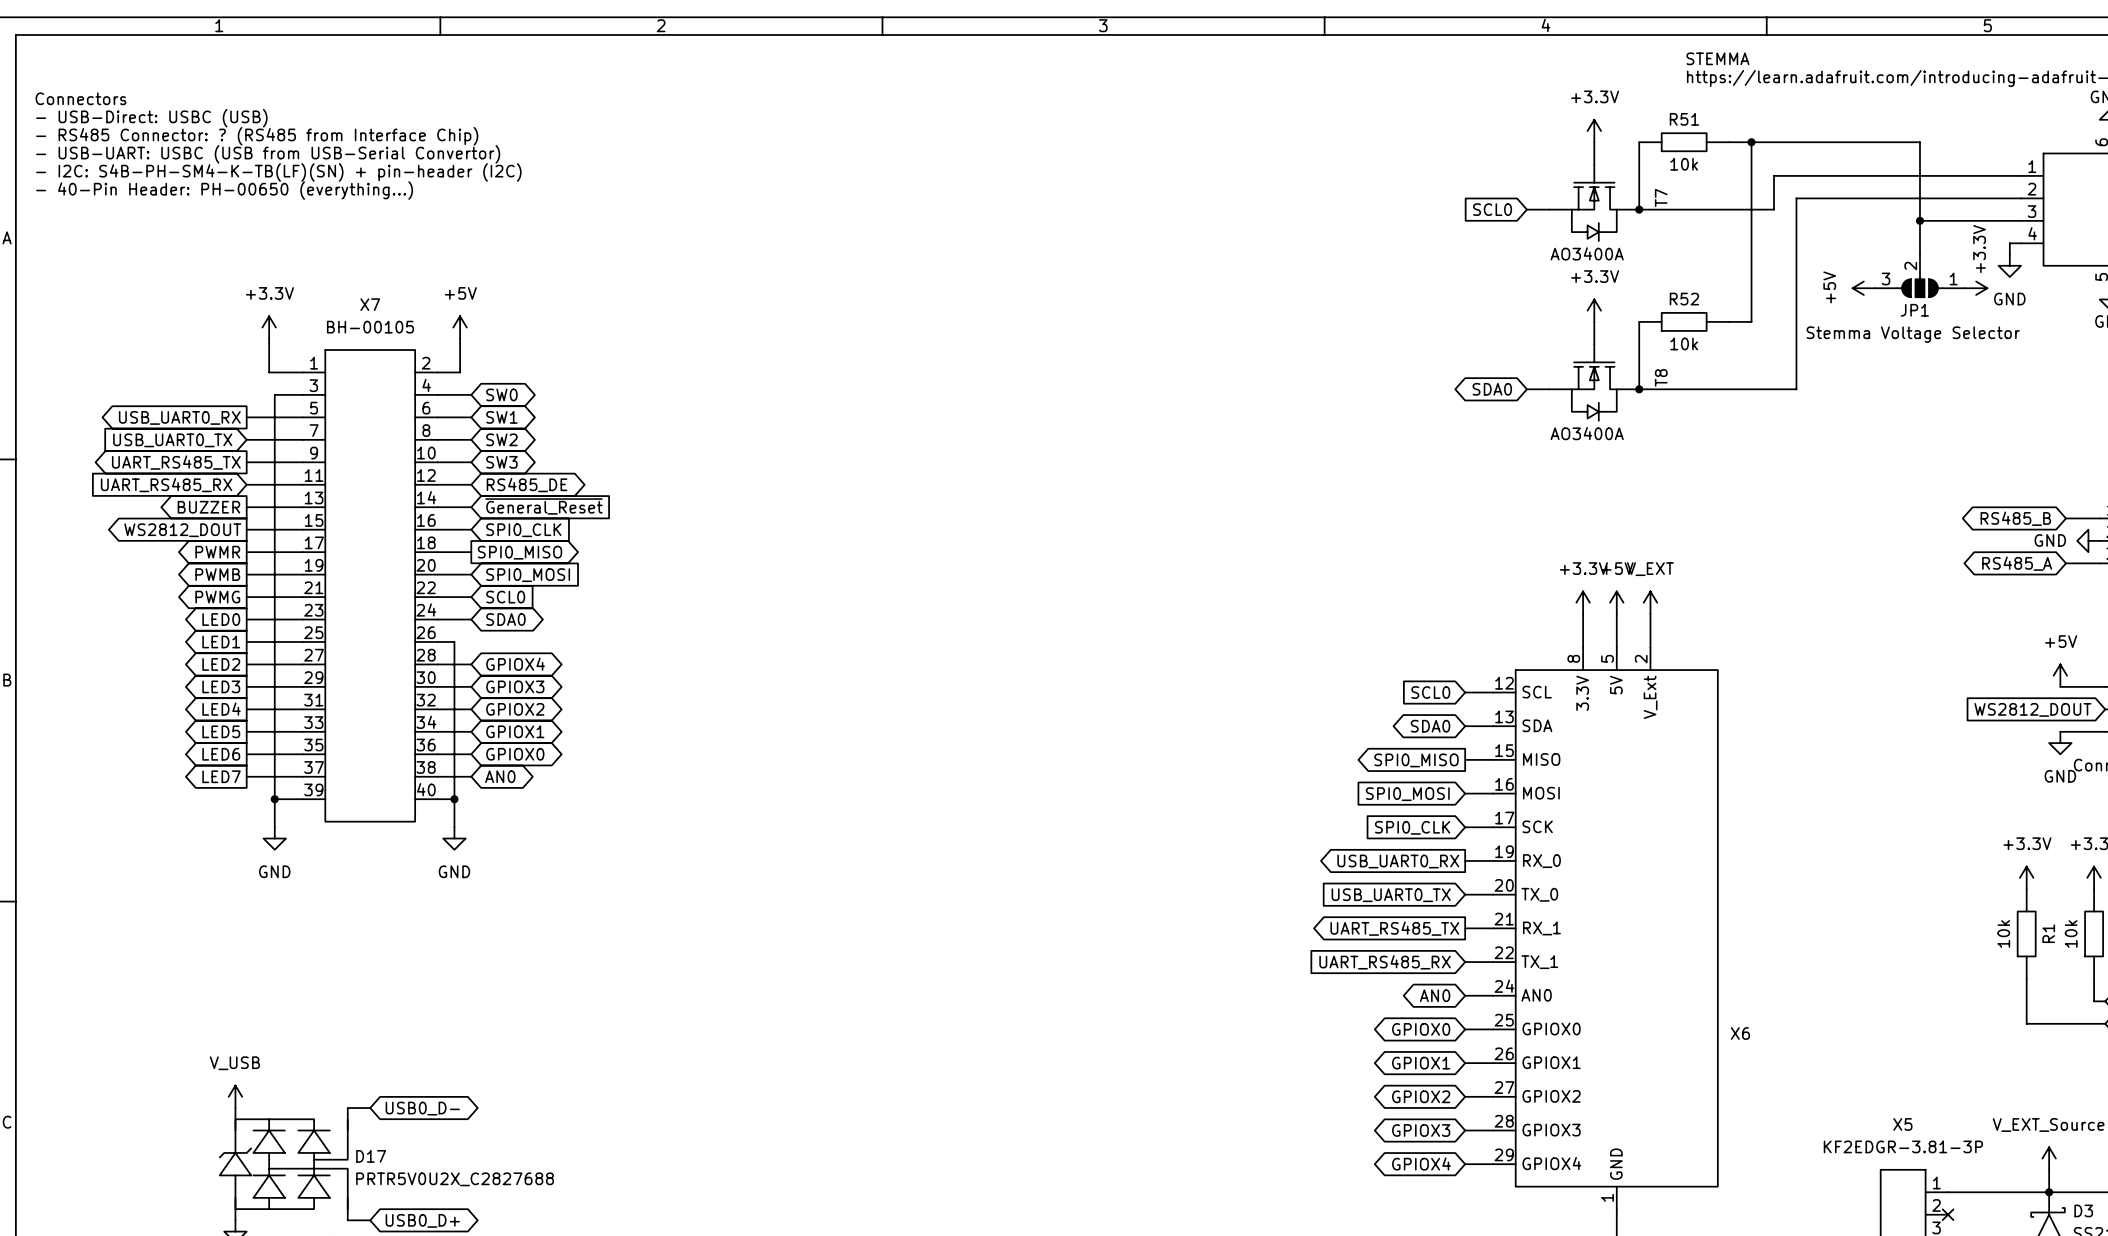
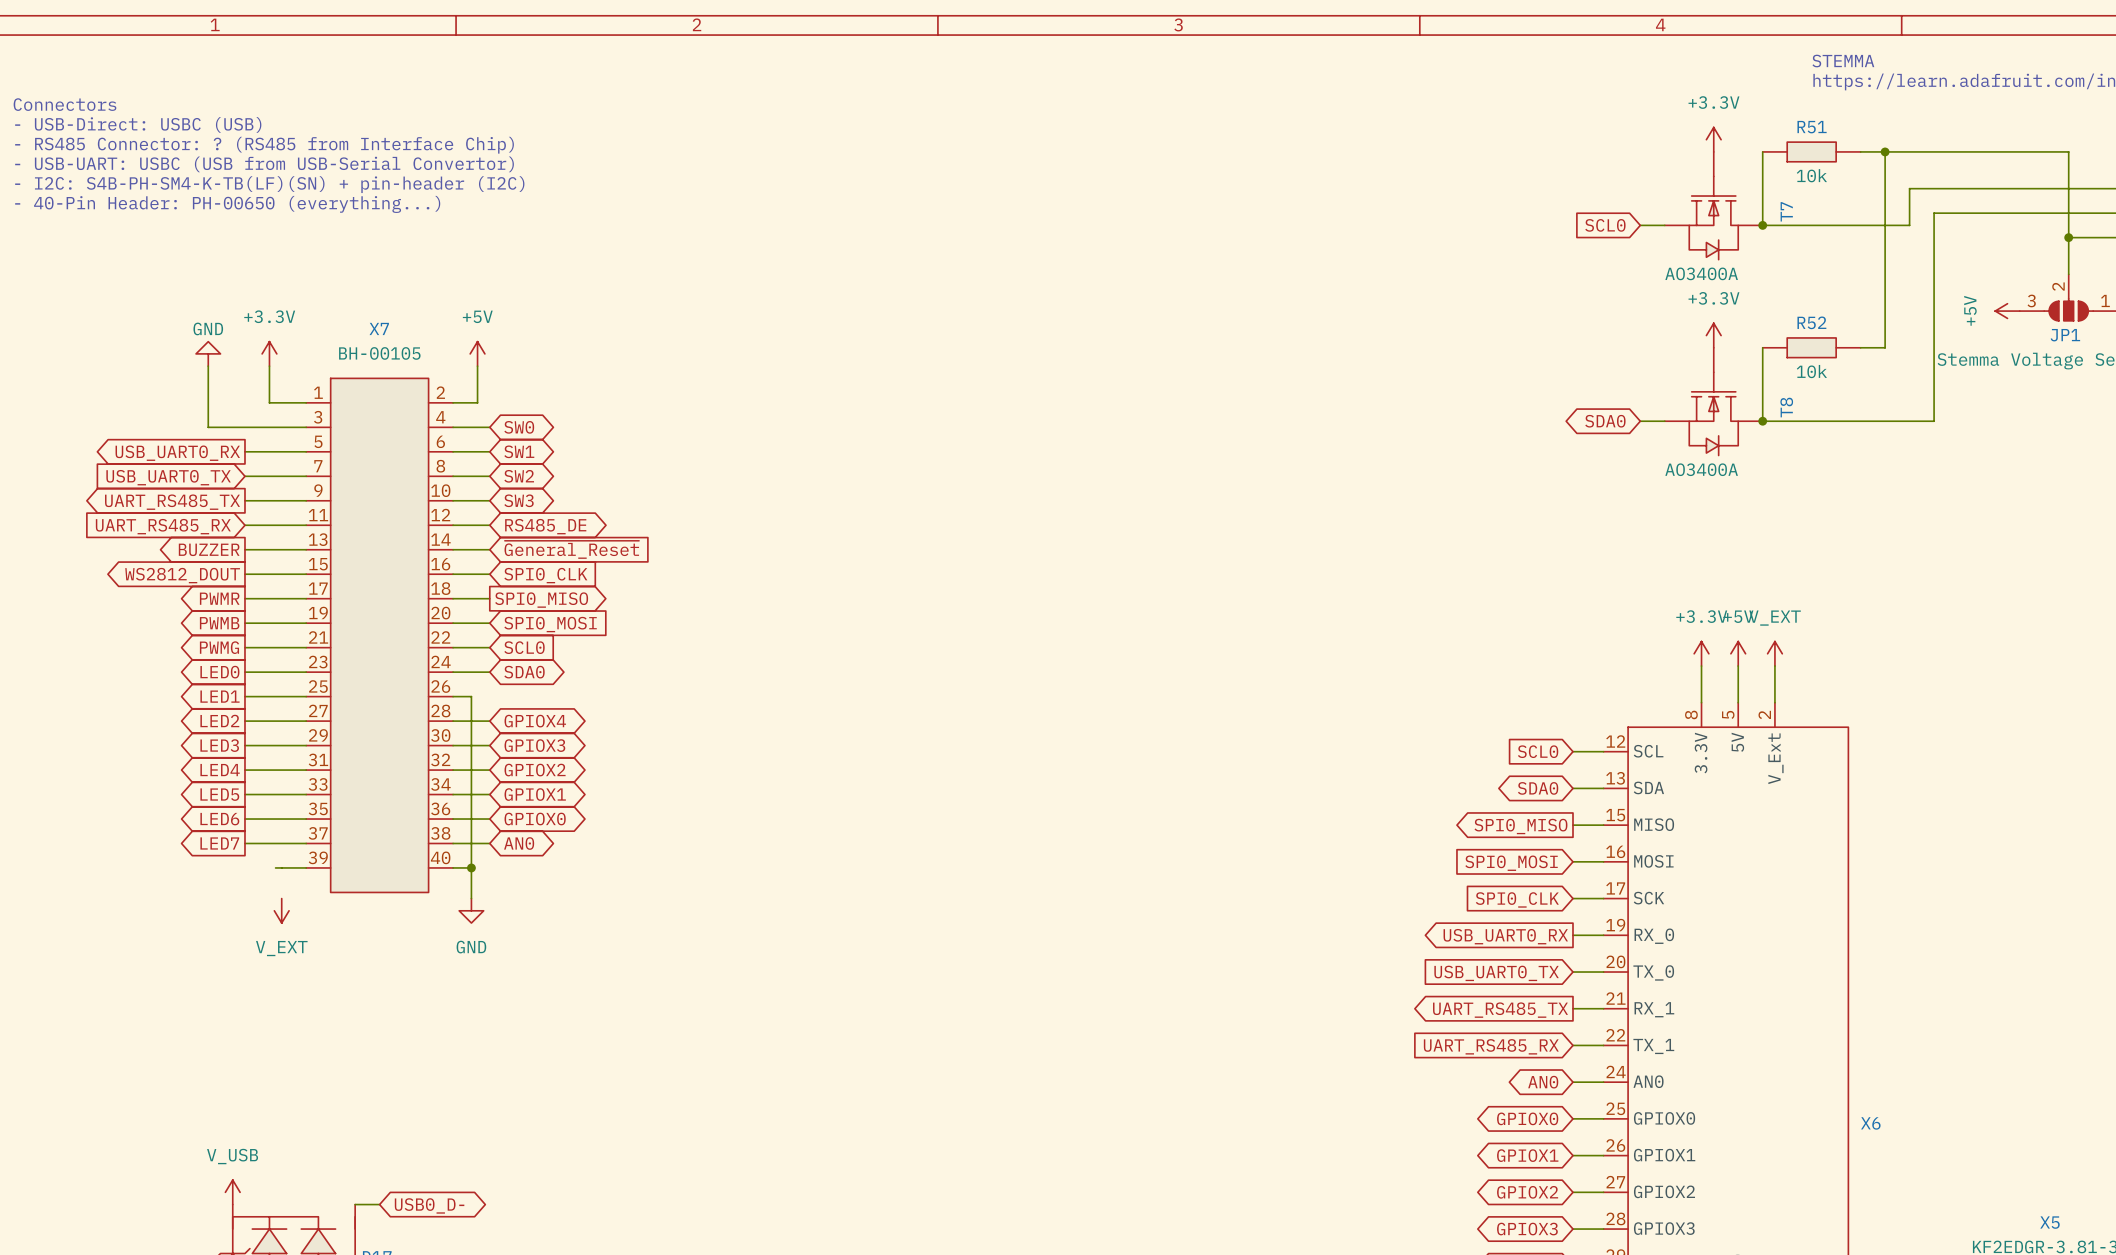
power symbol: none -> GND (208, 353)
wire: (274, 394) (274, 827) -> (275, 427) (208, 427) (208, 366)
junction: (274, 799) -> none
power symbol: GND (274, 838) -> V_EXT (281, 910)

